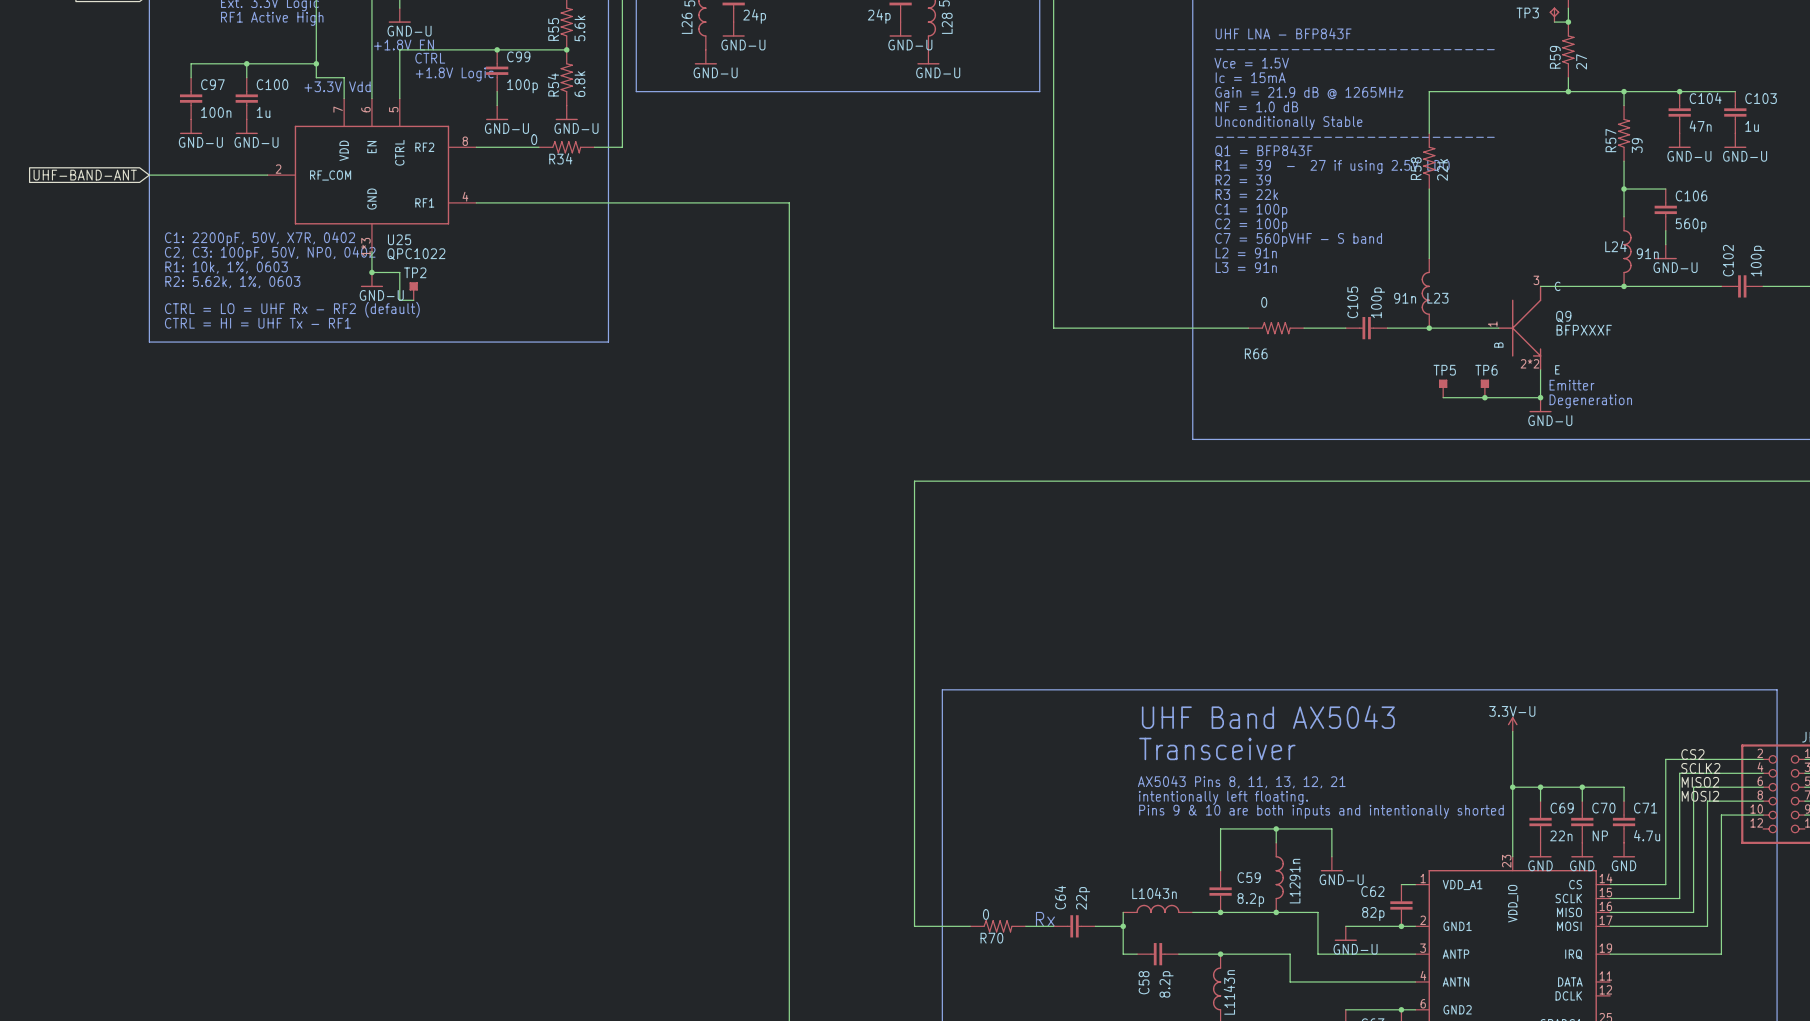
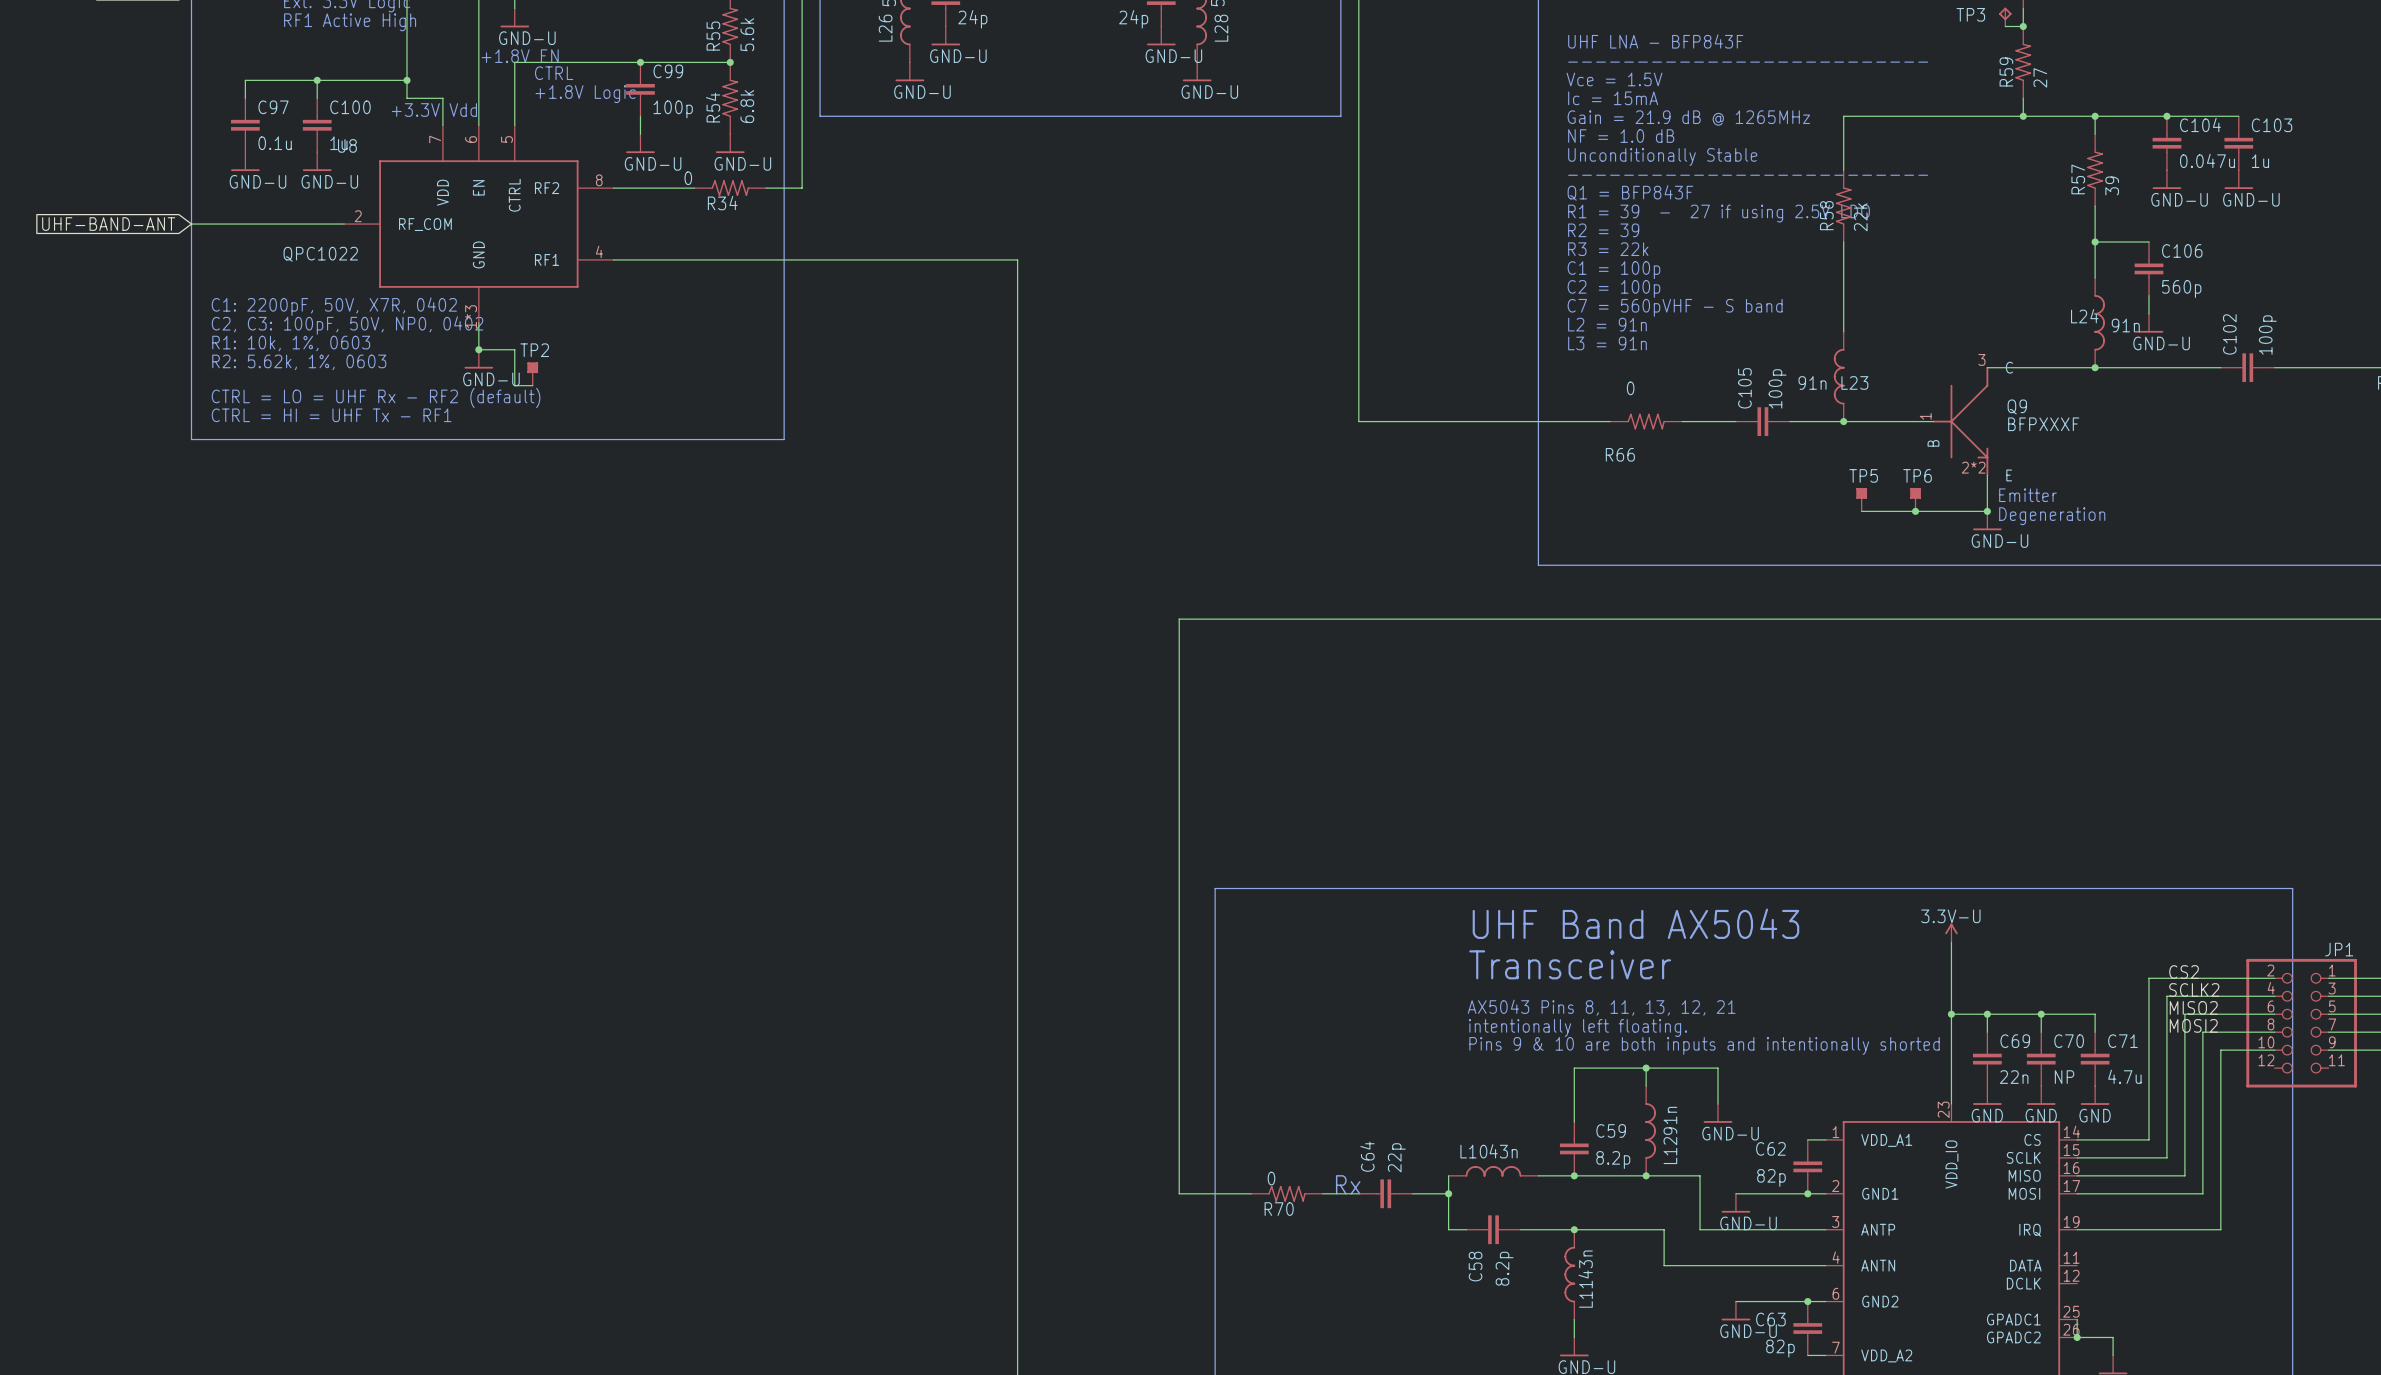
C97 value: 100n (216, 112) -> 0.1u (275, 143)
C104 value: 47n (1700, 126) -> 0.047u (2207, 160)
U25 name: U25 (399, 239) -> U8 (347, 145)
U25 value position: QPC1022 (416, 254) -> QPC1022 (320, 254)

